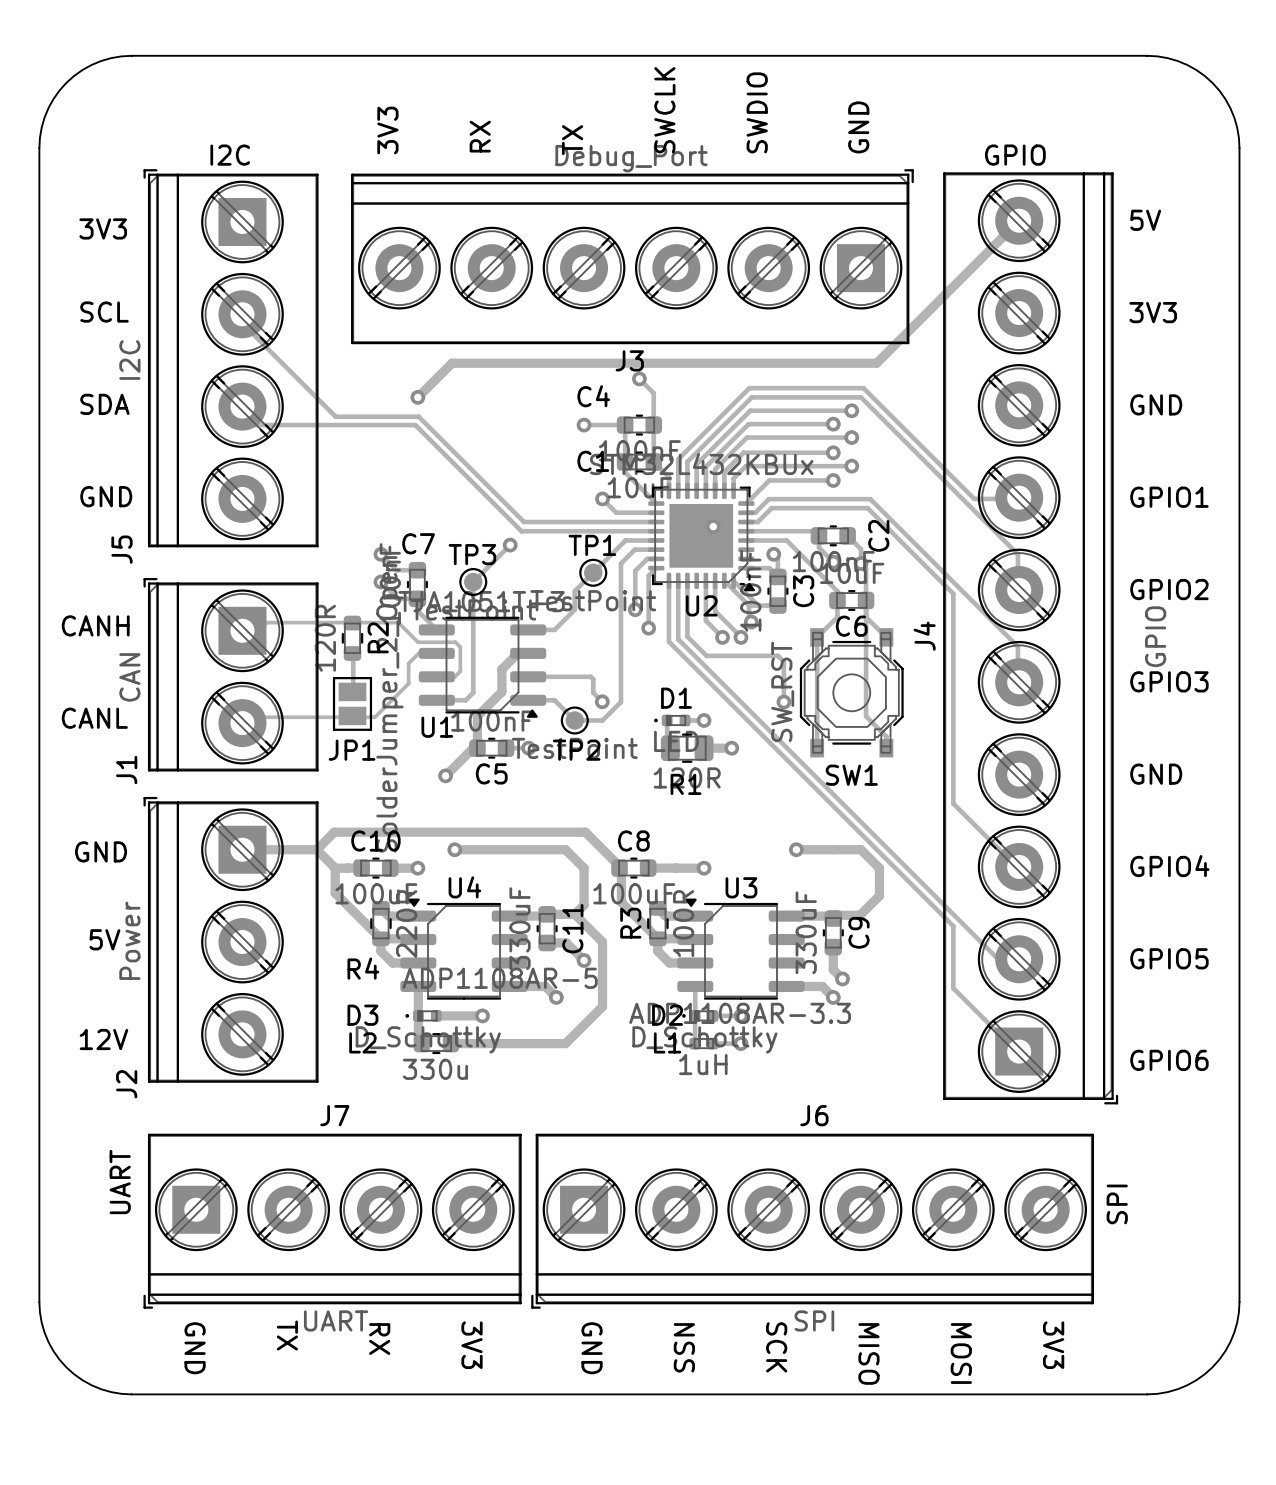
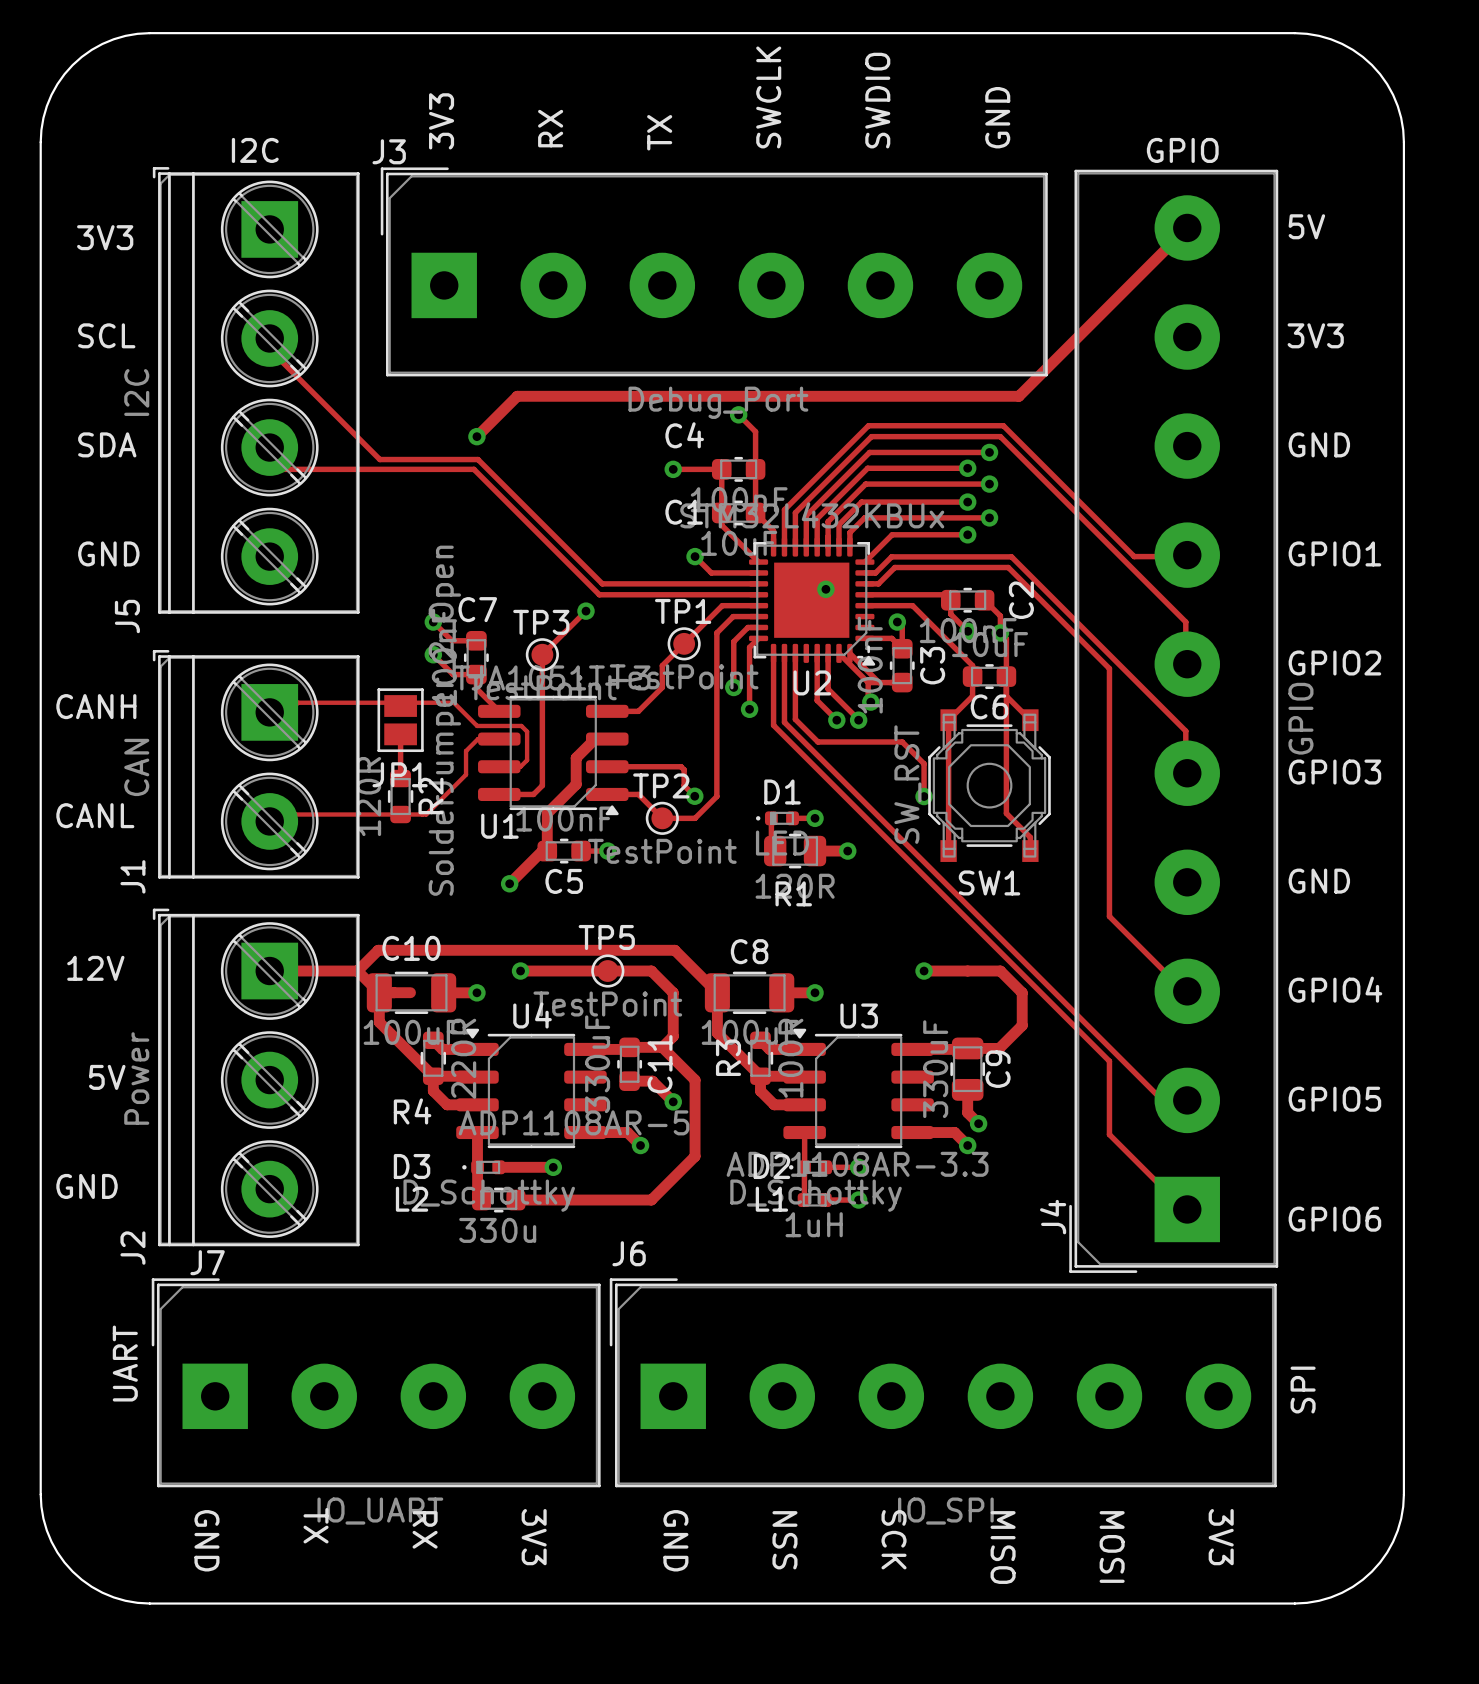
board edge: (140, 55) (121, 56) (101, 60) (74, 75) (59, 90) (48, 108) (39, 137) (39, 1302) (44, 1332) (59, 1359) (74, 1374) (91, 1385) (111, 1392) (131, 1394) (1147, 1394) (1167, 1392) (1187, 1385) (1212, 1367) (1230, 1342) (1238, 1312) (1239, 148) (1237, 127) (1230, 108) (1219, 90) (1204, 75) (1187, 64) (1167, 58) (1110, 55) -> (149, 33) (113, 39) (91, 49) (72, 65) (51, 94) (43, 117) (40, 142) (41, 1506) (46, 1530) (57, 1552) (81, 1579) (113, 1597) (149, 1603) (1294, 1603) (1319, 1600) (1342, 1592) (1362, 1579) (1380, 1562) (1397, 1530) (1403, 1494) (1403, 142) (1397, 106) (1387, 84) (1371, 65) (1342, 43) (1319, 35) (1294, 33)
J3 value position: Debug_Port (631, 158) -> Debug_Port (718, 402)
J3 footprint: [351, 169, 914, 345] -> [380, 167, 1048, 377]
J4 footprint: [943, 172, 1119, 1105] -> [1069, 169, 1279, 1273]
text position: 5V (1145, 220) -> 5V (1306, 226)
text position: 3V3 (1153, 312) -> 3V3 (1315, 335)
J3 name position: J3 (629, 360) -> J3 (389, 151)
text position: GND (1156, 404) -> GND (1319, 444)
text position: GPIO1 (1169, 497) -> GPIO1 (1334, 553)
text position: GPIO2 (1169, 589) -> GPIO2 (1334, 662)
J4 name position: J4 (924, 636) -> J4 (1053, 1217)
R2 position: (352, 638) -> (400, 796)
track: (783, 661) (783, 702) -> (909, 749) (924, 763) (924, 796)
text position: GPIO3 (1169, 681) -> GPIO3 (1334, 772)
via position: (783, 702) -> (924, 796)
JP1 position: (352, 703) -> (400, 720)
TP2 name position: TP2 (576, 750) -> TP2 (661, 785)
text position: GND (1156, 774) -> GND (1319, 881)
TP5: none -> TestPoint (607, 971)
text position: GND (101, 851) -> GND (87, 1186)
C10 footprint: [353, 857, 399, 879] -> [366, 971, 457, 1014]
C8 footprint: [611, 857, 657, 879] -> [704, 971, 795, 1014]
text position: GPIO4 (1169, 866) -> GPIO4 (1335, 989)
track: (648, 868) (675, 868) -> none
C9 footprint: [822, 910, 844, 956] -> [950, 1037, 986, 1101]
text position: GPIO5 (1169, 958) -> GPIO5 (1334, 1099)
text position: 12V (103, 1039) -> 12V (95, 968)
text position: GPIO6 (1169, 1060) -> GPIO6 (1334, 1219)
J7 name position: J7 (334, 1115) -> J7 (207, 1262)
J6 name position: J6 (814, 1115) -> J6 (629, 1253)
J7 footprint: [143, 1133, 522, 1309] -> [151, 1278, 601, 1488]
J6 footprint: [531, 1133, 1095, 1309] -> [609, 1278, 1277, 1488]
J7 value: UART (336, 1320) -> IO_UART (380, 1511)
J6 value: SPI (814, 1320) -> IO_SPI (945, 1511)
text position: TX (287, 1335) -> TX (316, 1525)
text position: RX (379, 1339) -> RX (425, 1529)
text position: 3V3 (472, 1345) -> 3V3 (534, 1537)
text position: 3V3 (1053, 1345) -> 3V3 (1221, 1537)
text position: NSS (684, 1347) -> NSS (784, 1540)
text position: SCK (776, 1347) -> SCK (894, 1539)
text position: GND (195, 1348) -> GND (206, 1540)
text position: GND (592, 1348) -> GND (675, 1540)
text position: MISO (868, 1353) -> MISO (1003, 1547)
text position: MOSI (961, 1353) -> MOSI (1112, 1547)

